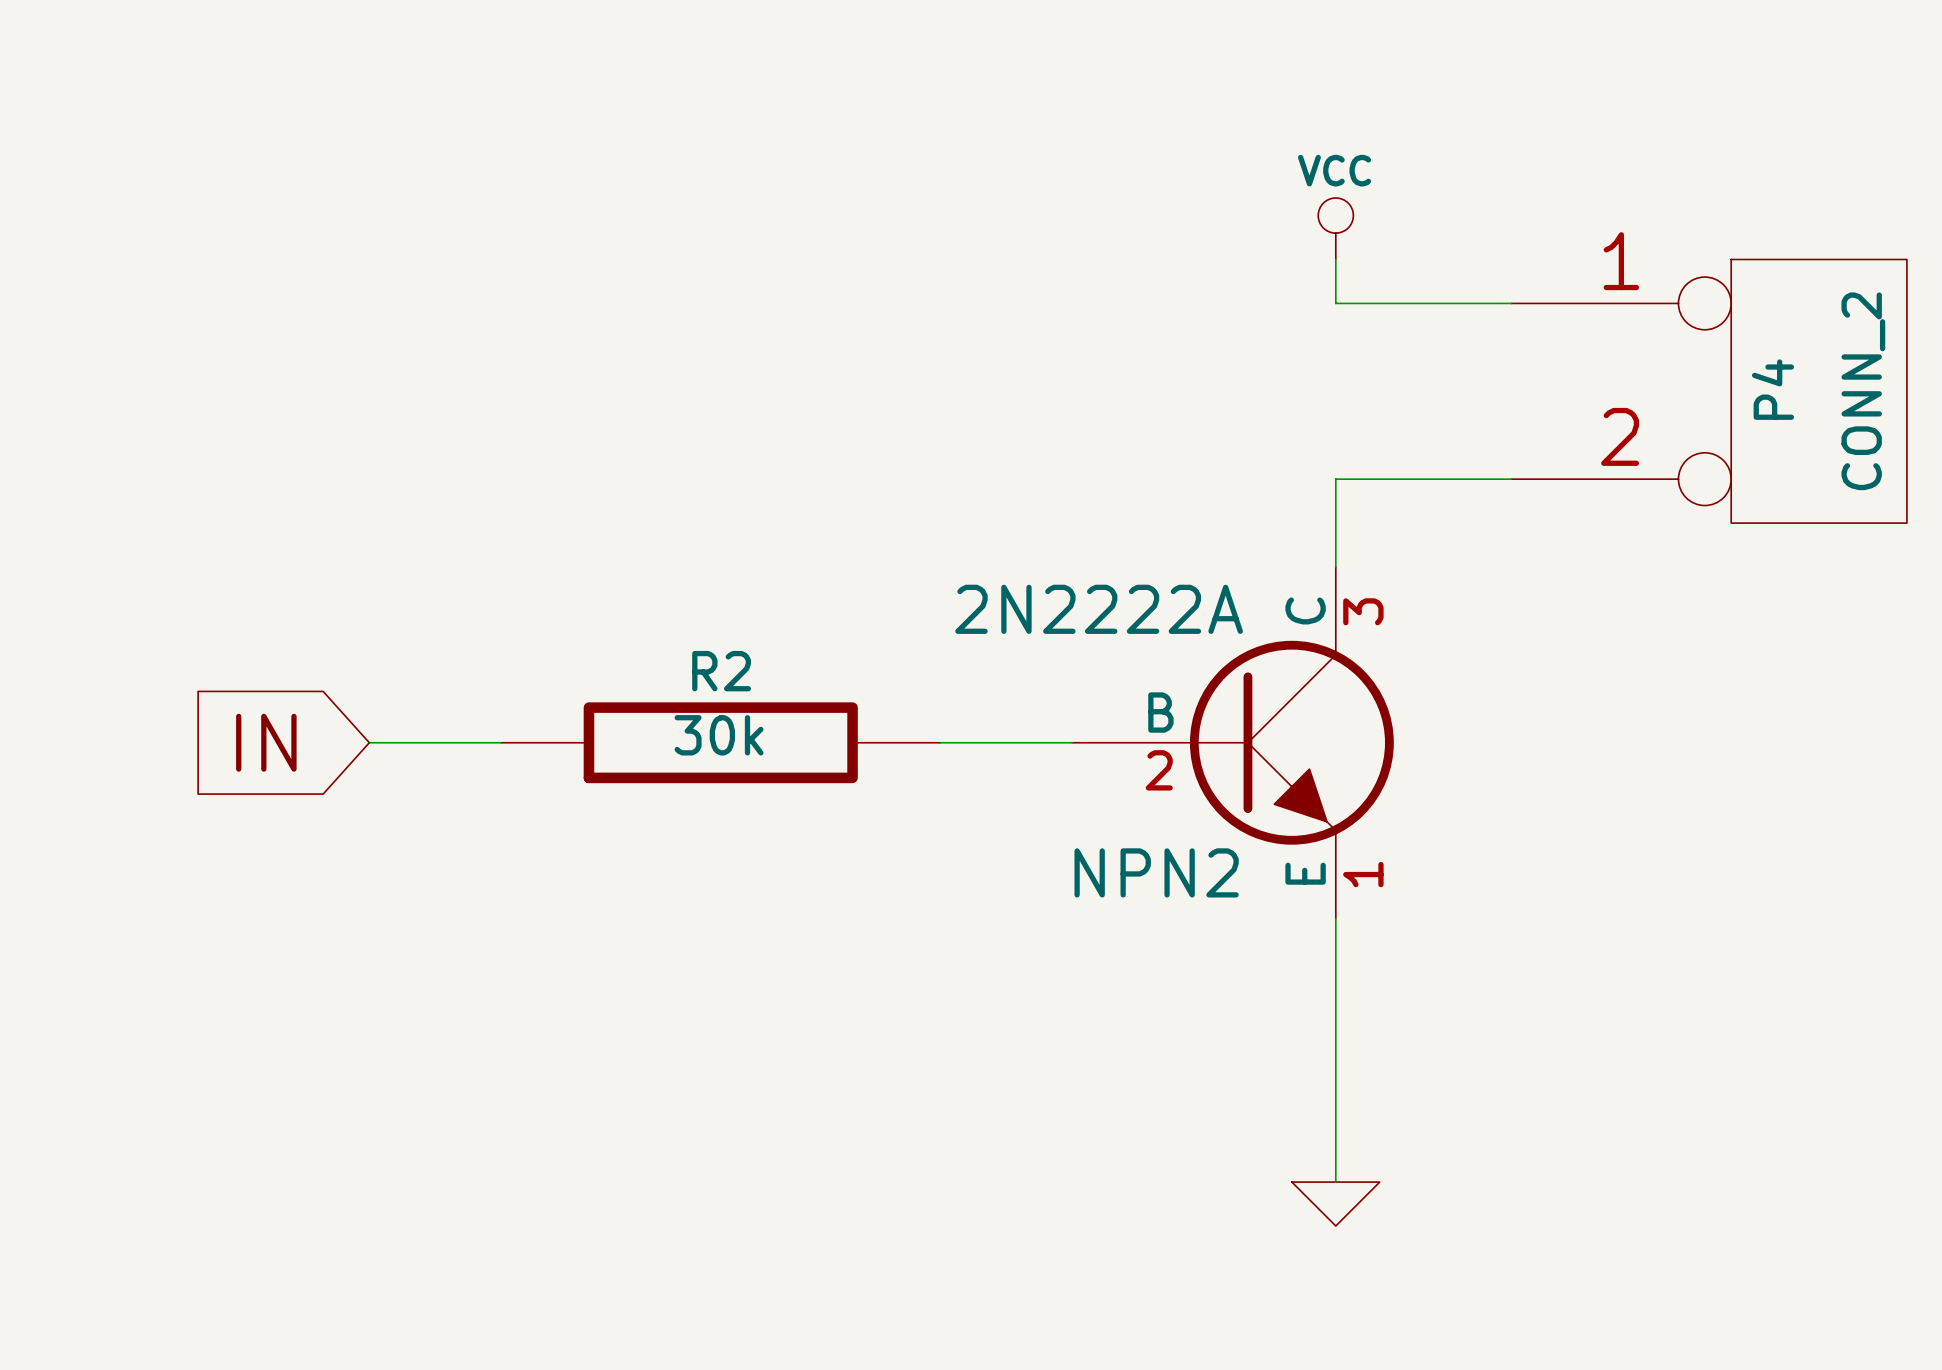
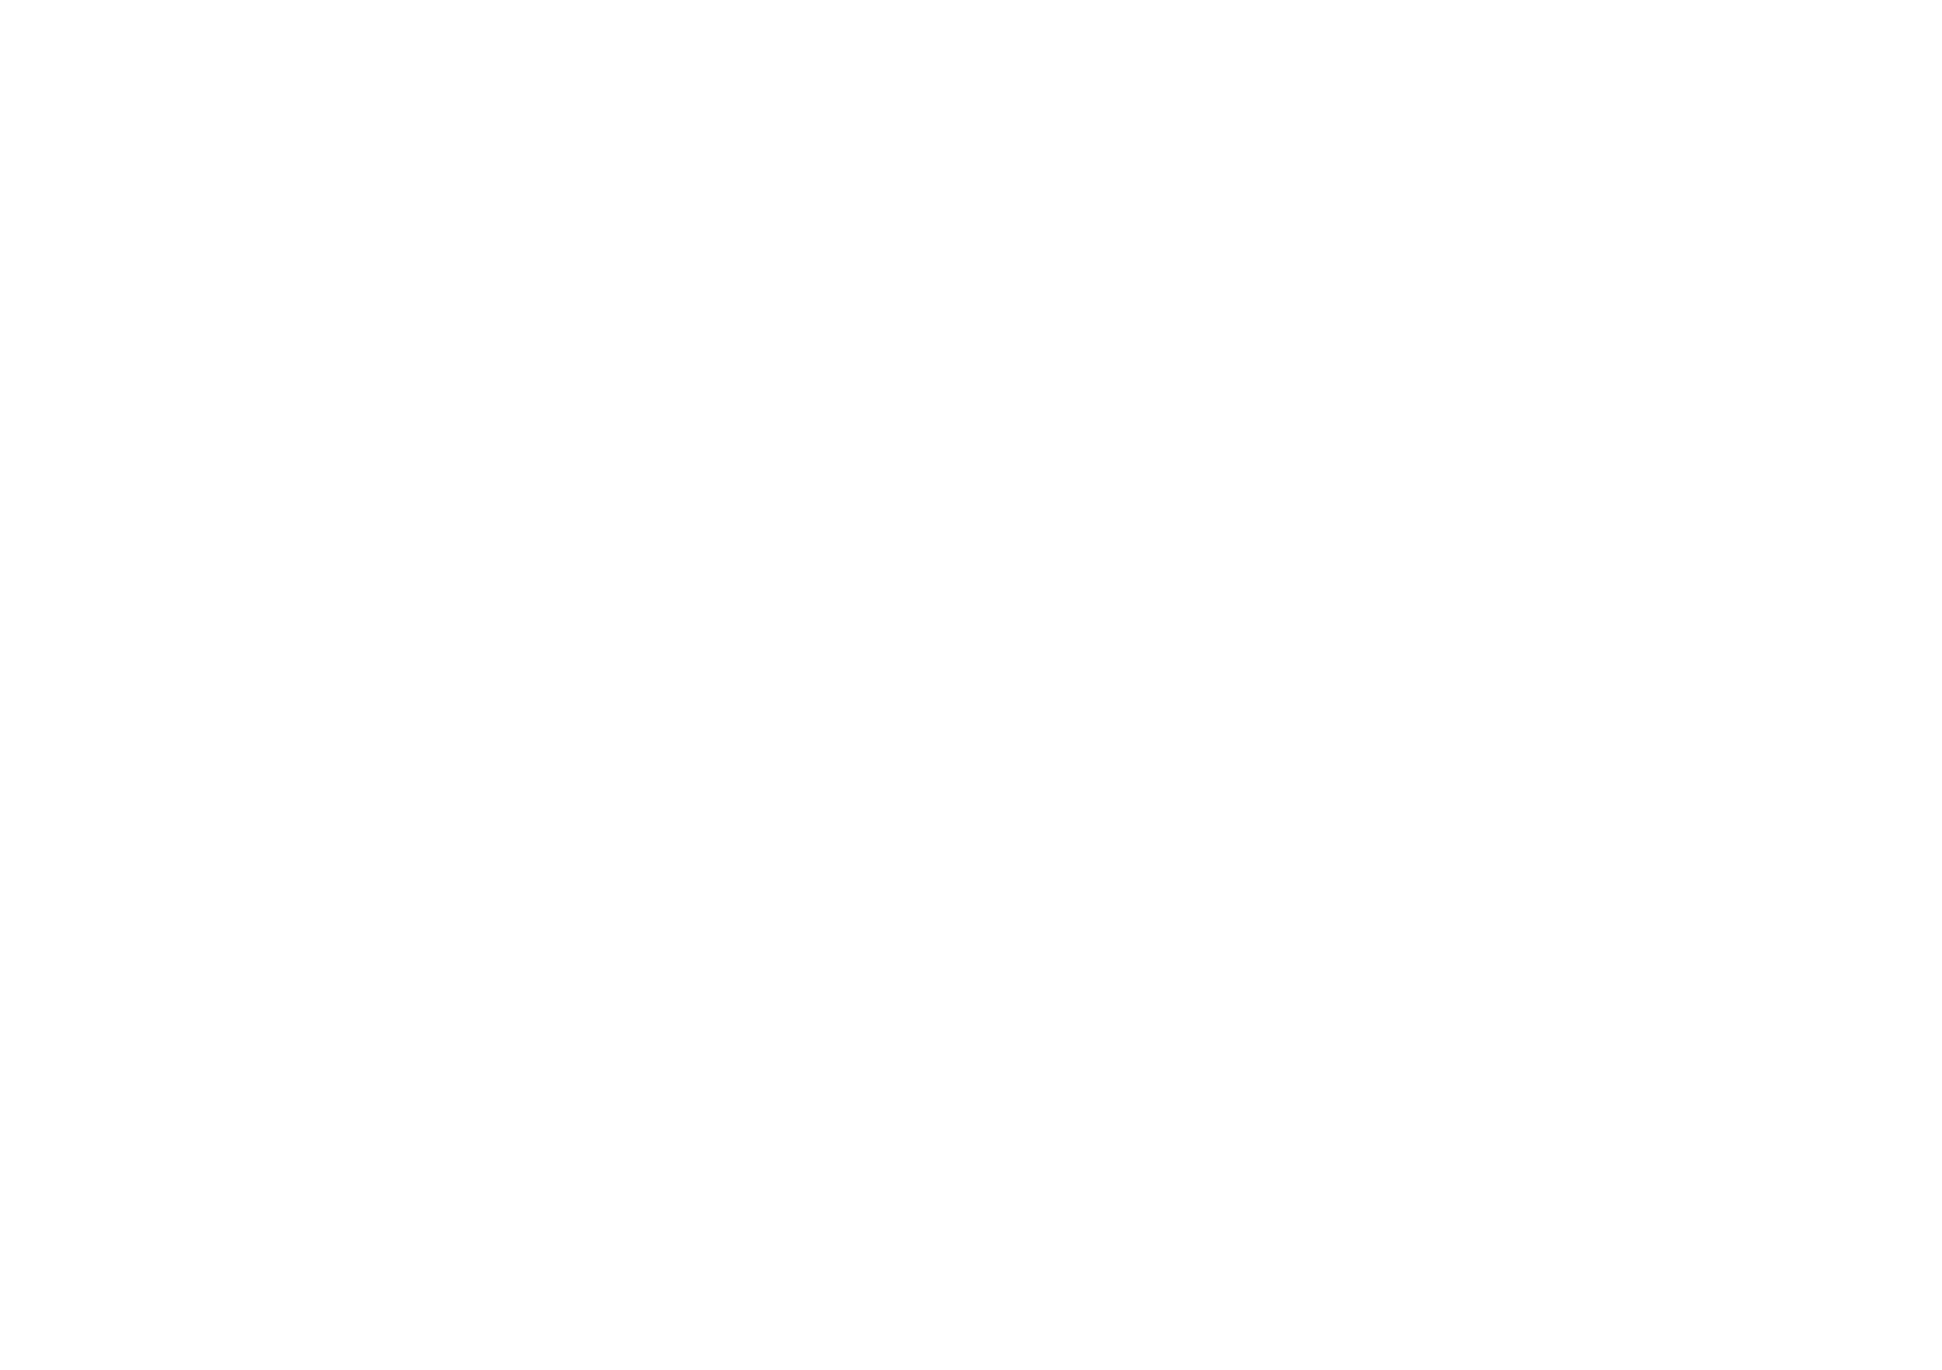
power symbol: VCC (1335, 228) -> none
wire: (1335, 259) (1335, 303) (1511, 303) -> none
P4: CONN_2 (1709, 391) -> none
wire: (1511, 479) (1335, 479) (1335, 567) -> none
global label: IN (266, 742) -> none
wire: (369, 742) (501, 742) -> none
R2: 30k (720, 742) -> none
wire: (940, 742) (1072, 742) -> none
NPN2: 2N2222A (1233, 742) -> none
wire: (1335, 918) (1335, 1182) -> none
power symbol: (1335, 1204) -> none

